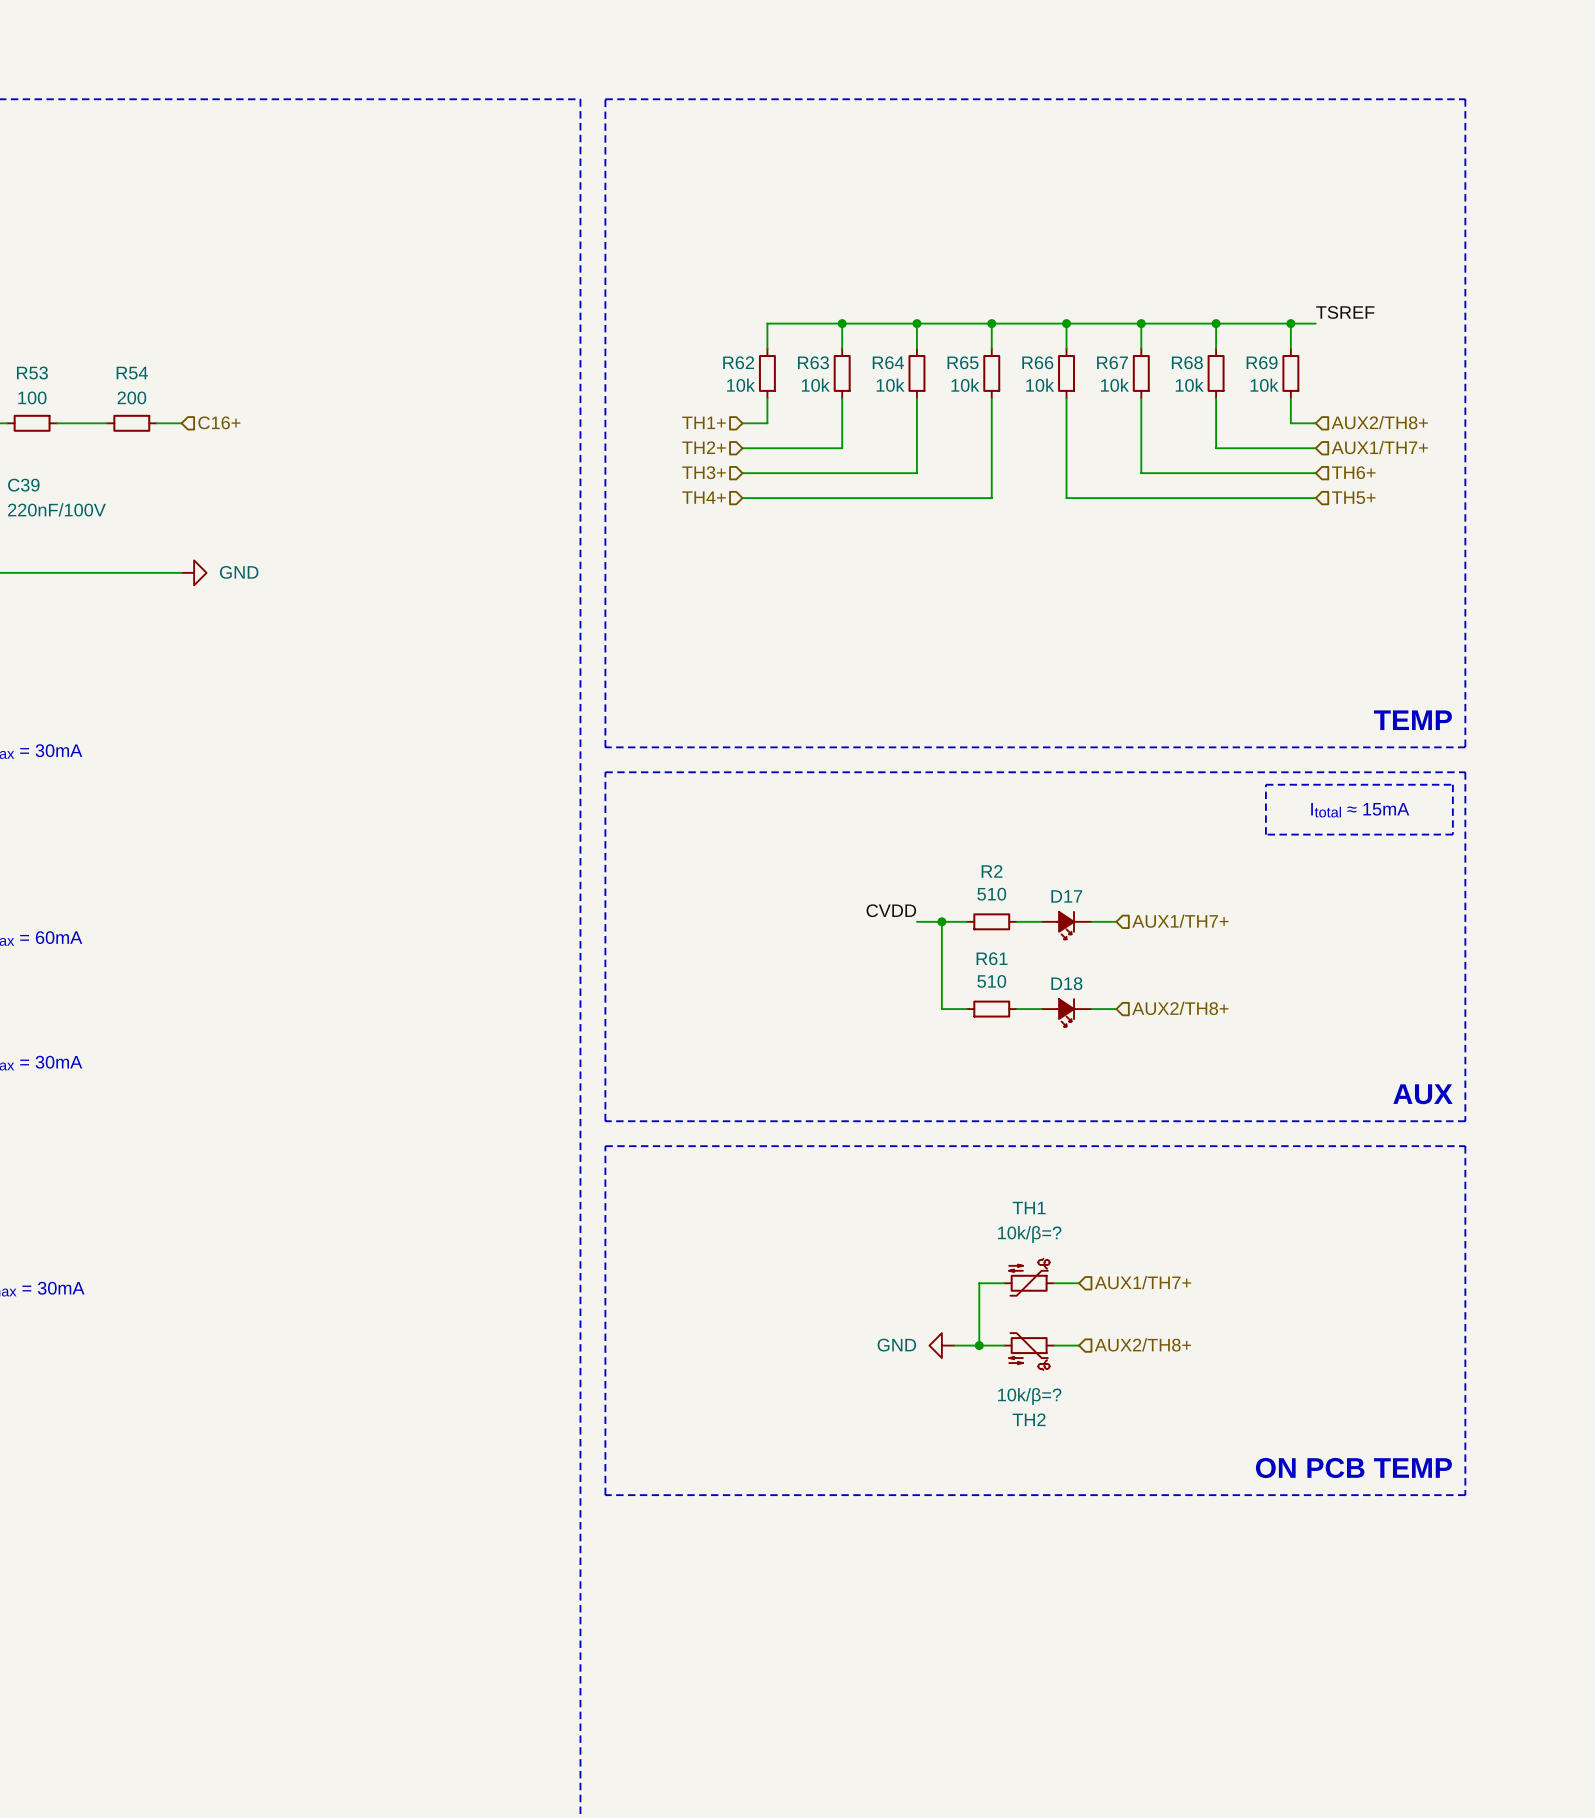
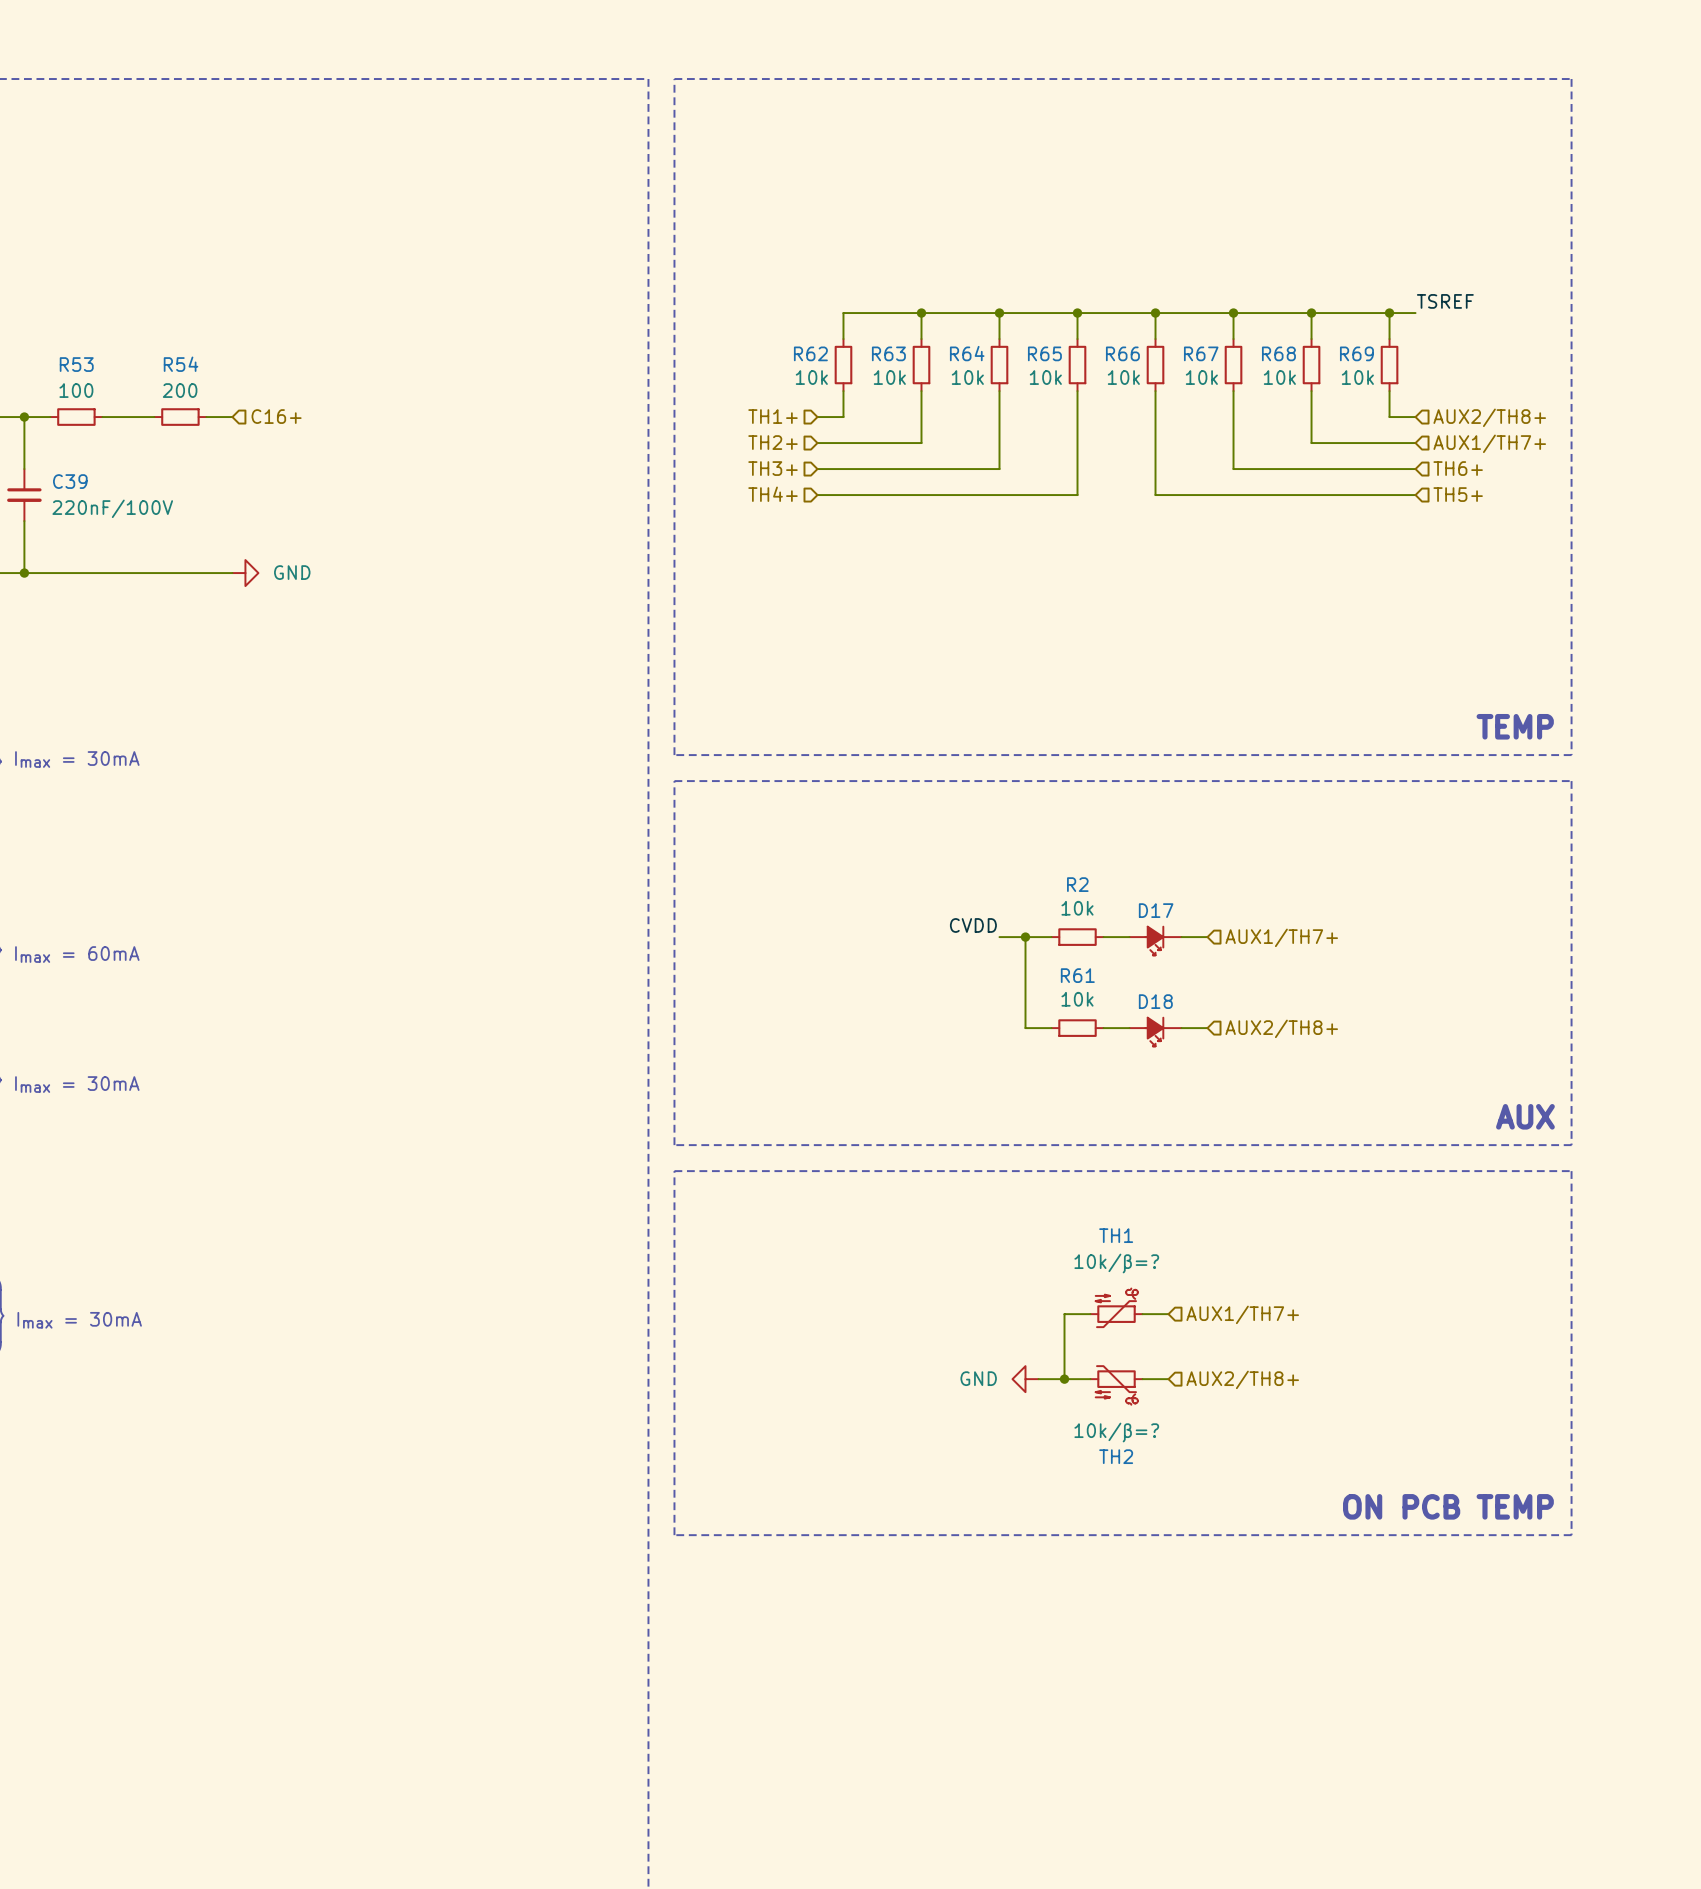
line: (1265, 784) (1452, 784) (1452, 834) (1265, 834) (1265, 784) -> none
text: Itotal ≈ 15mA (1360, 810) -> none
R2 value: 510 (991, 894) -> 10k (1077, 908)
R61 value: 510 (991, 981) -> 10k (1077, 999)

